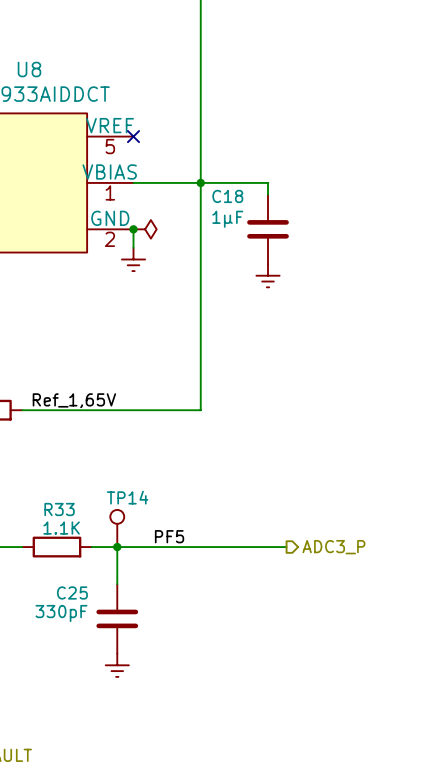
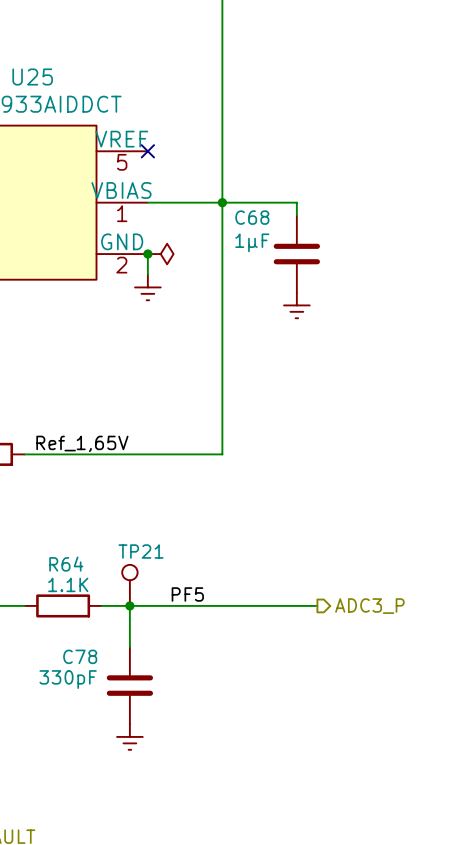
U8 name: U8 (29, 69) -> U25 (32, 76)
C18 name: C18 (227, 196) -> C68 (252, 217)
TP14 name: TP14 (127, 497) -> TP21 (141, 551)
R33 name: R33 (59, 509) -> R64 (66, 564)
C25 name: C25 (72, 592) -> C78 (80, 656)

